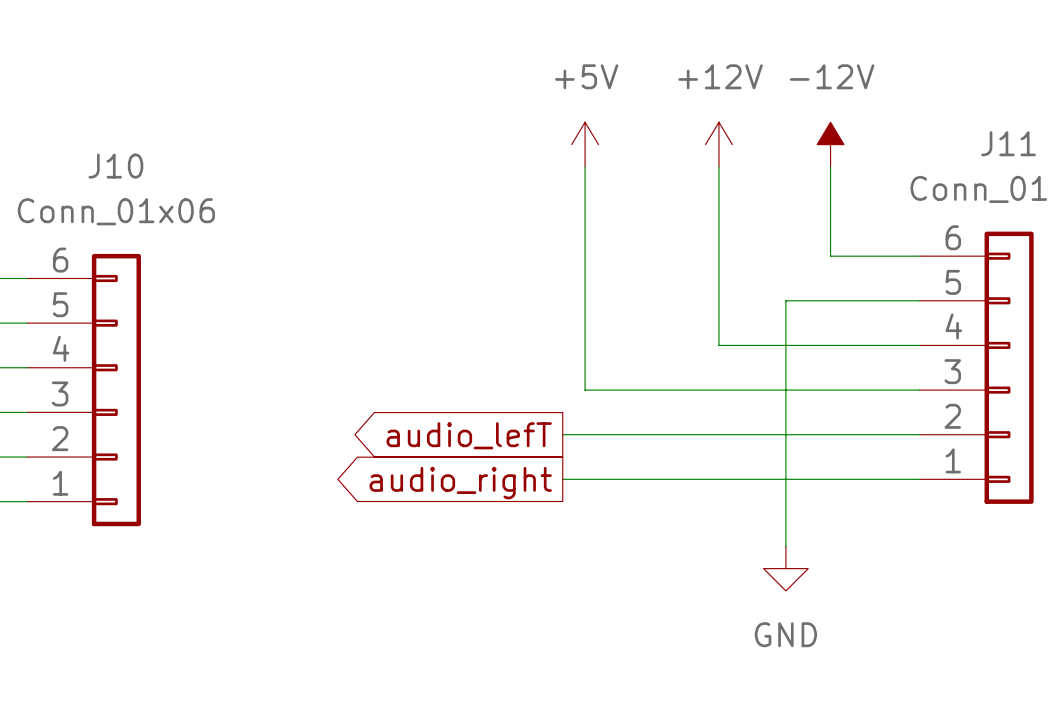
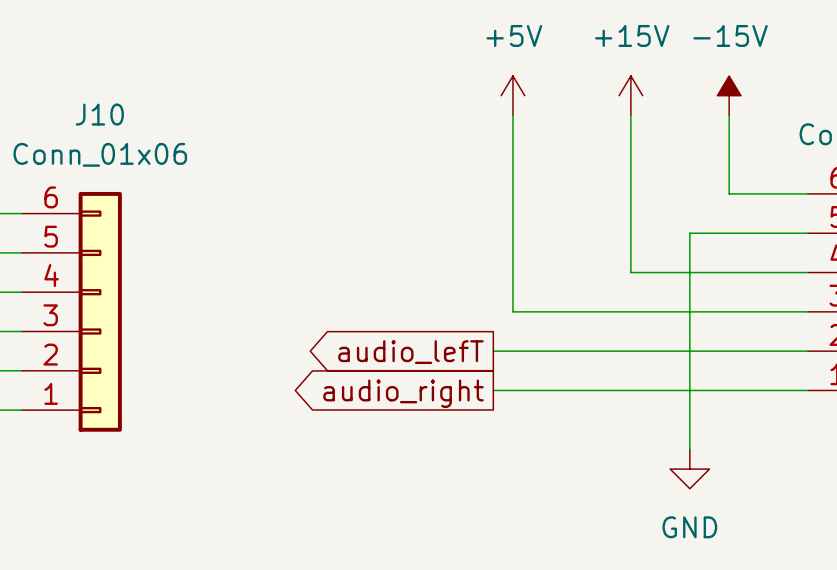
power symbol: +12V (718, 144) -> +15V (630, 95)
power symbol: -12V (830, 144) -> -15V (729, 95)

